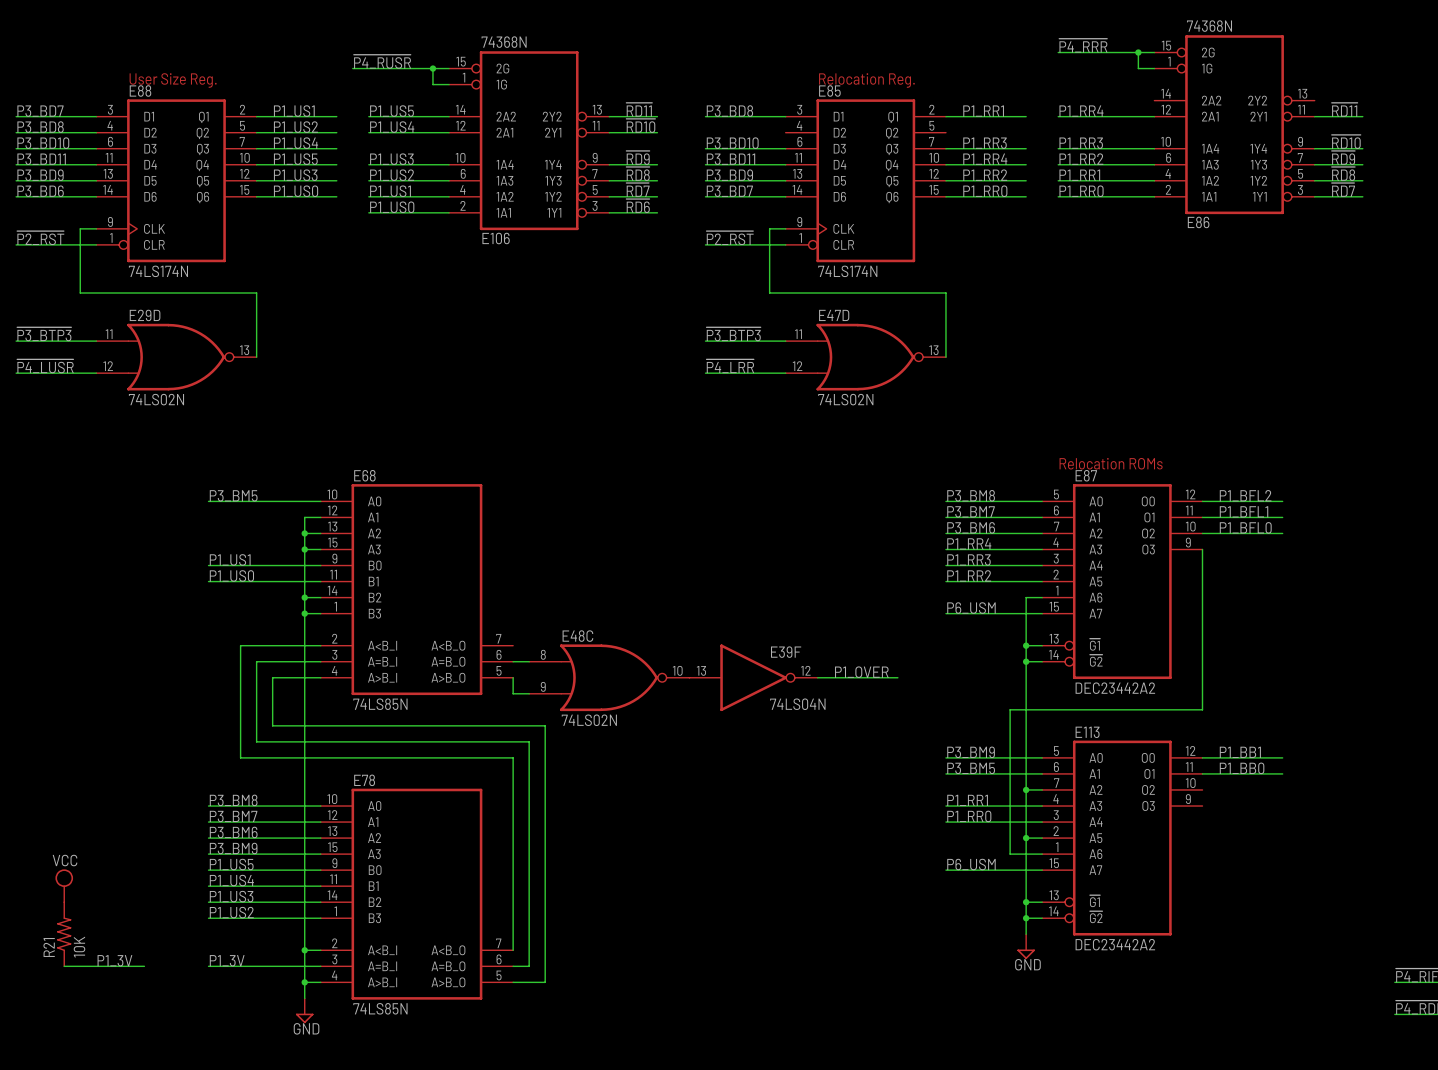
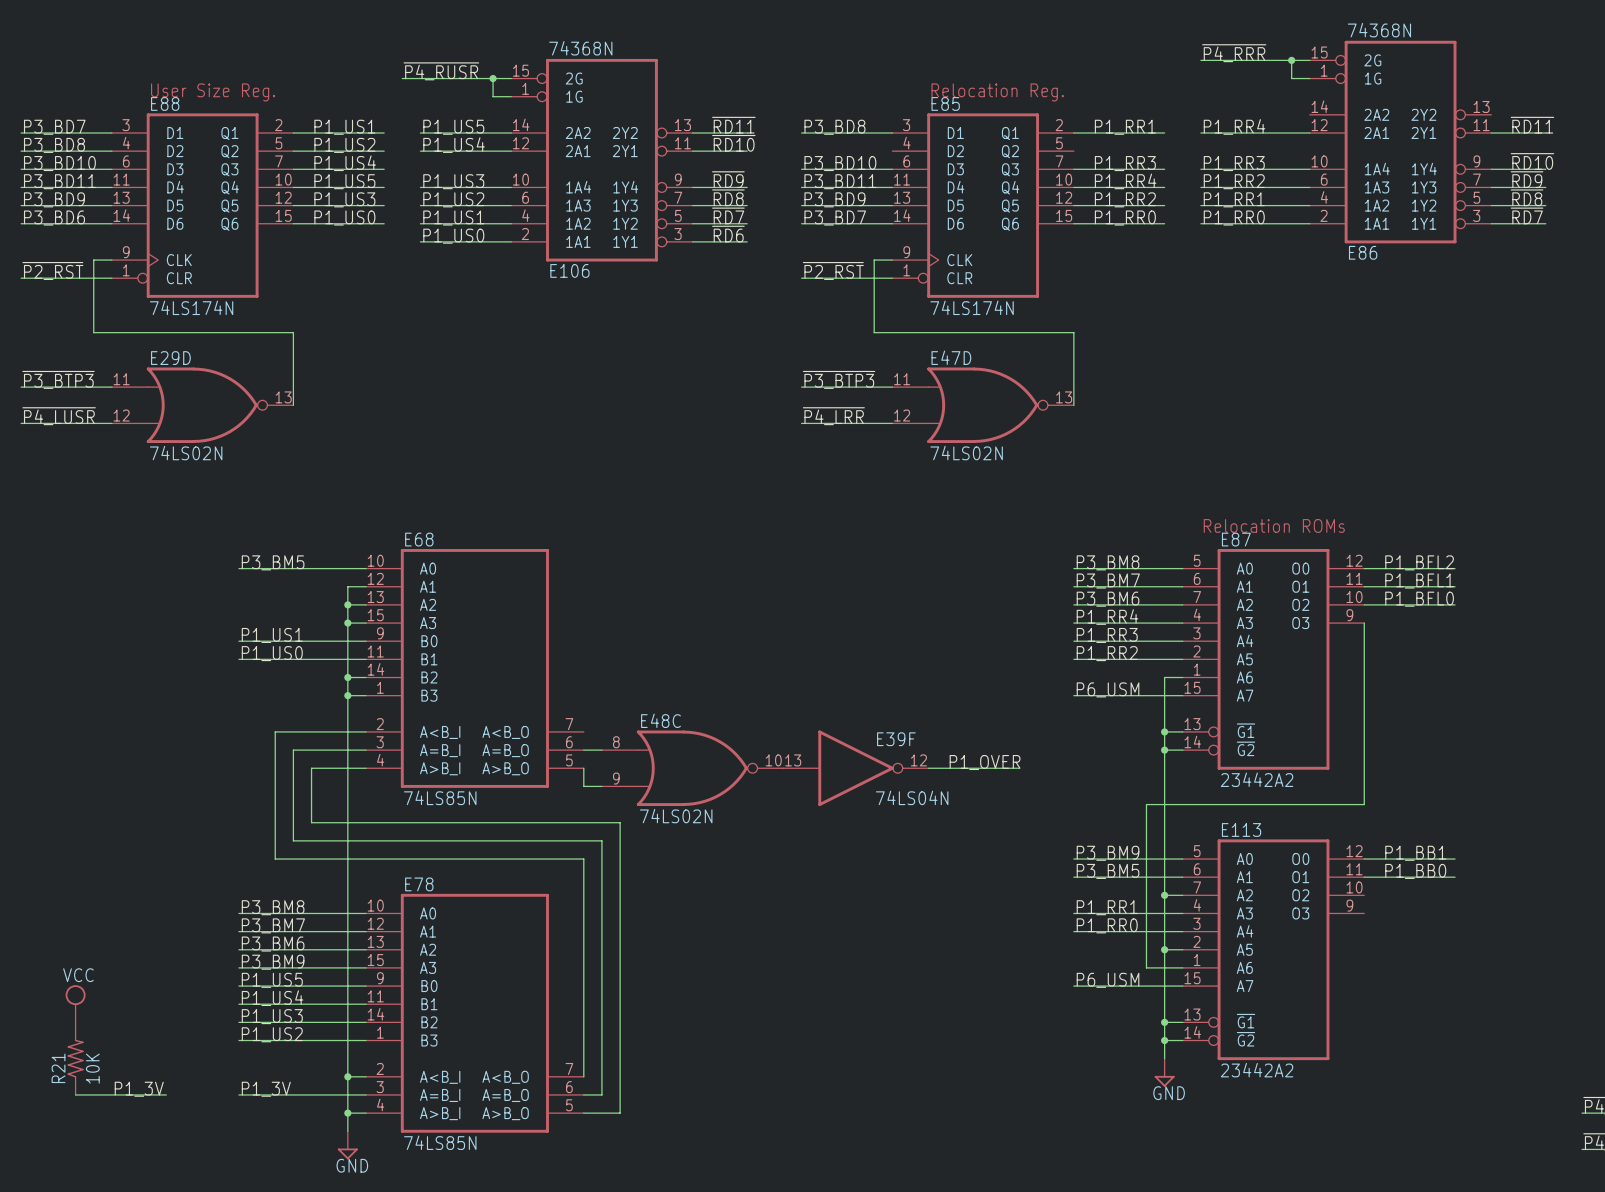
E87 value: DEC23442A2 (1115, 688) -> 23442A2 (1257, 779)
E113 value: DEC23442A2 (1115, 944) -> 23442A2 (1257, 1070)

